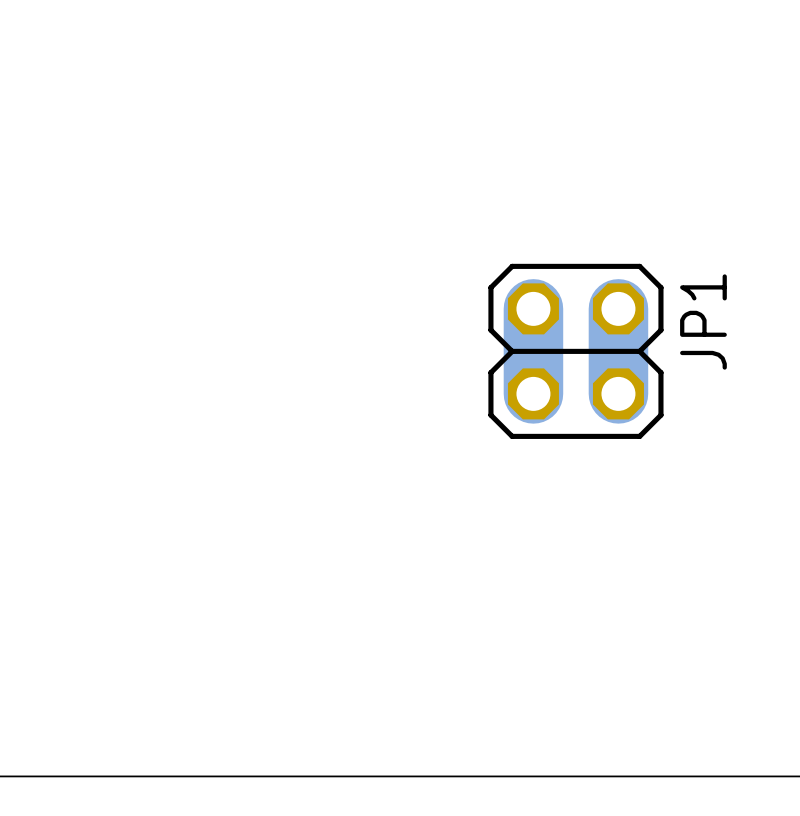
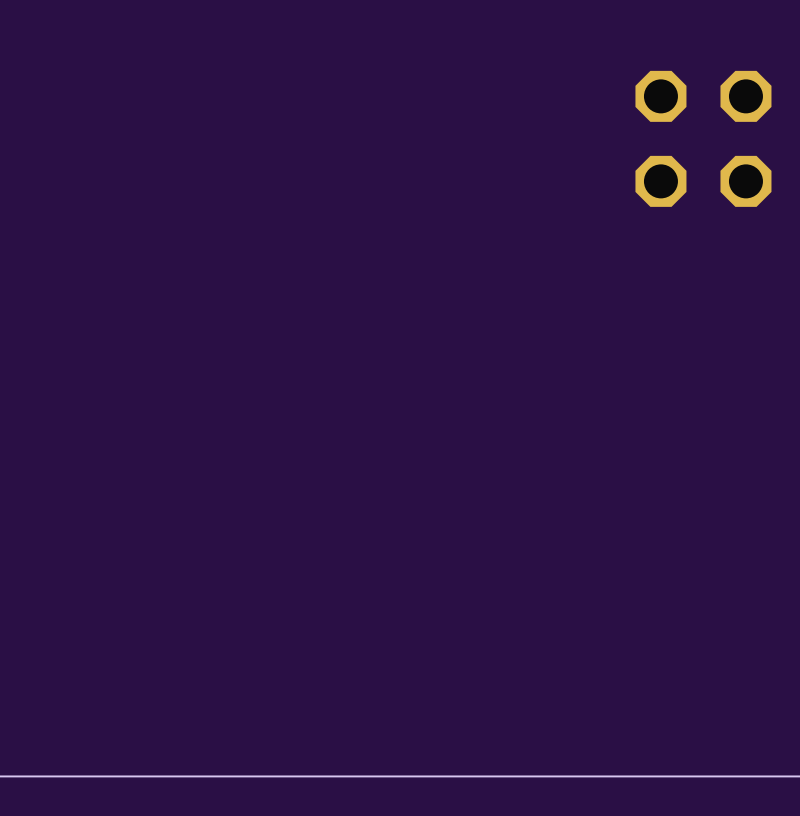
track: (533, 308) (533, 393) -> none
track: (618, 308) (618, 393) -> none
JP1 side: bottom (575, 351) -> top (703, 138)

